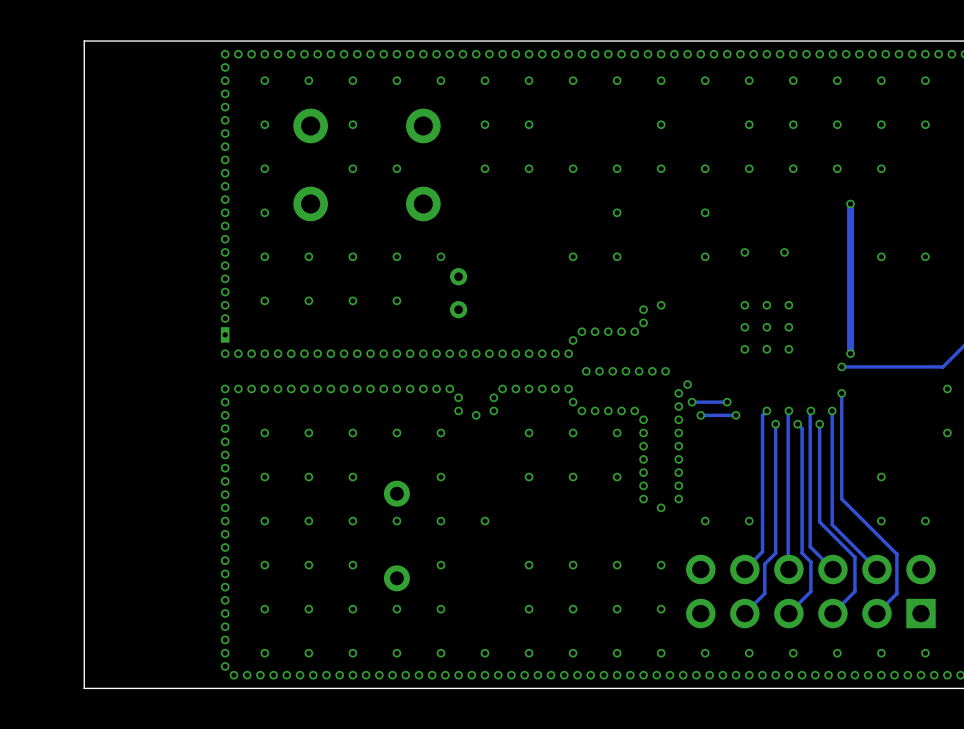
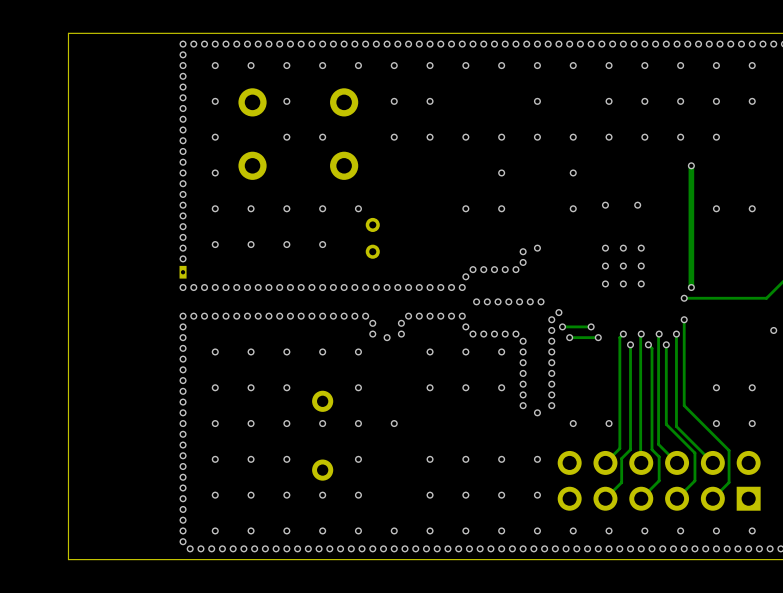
via: (947, 388) -> none
via: none -> (773, 330)
via: (947, 432) -> none
via: none -> (752, 387)

